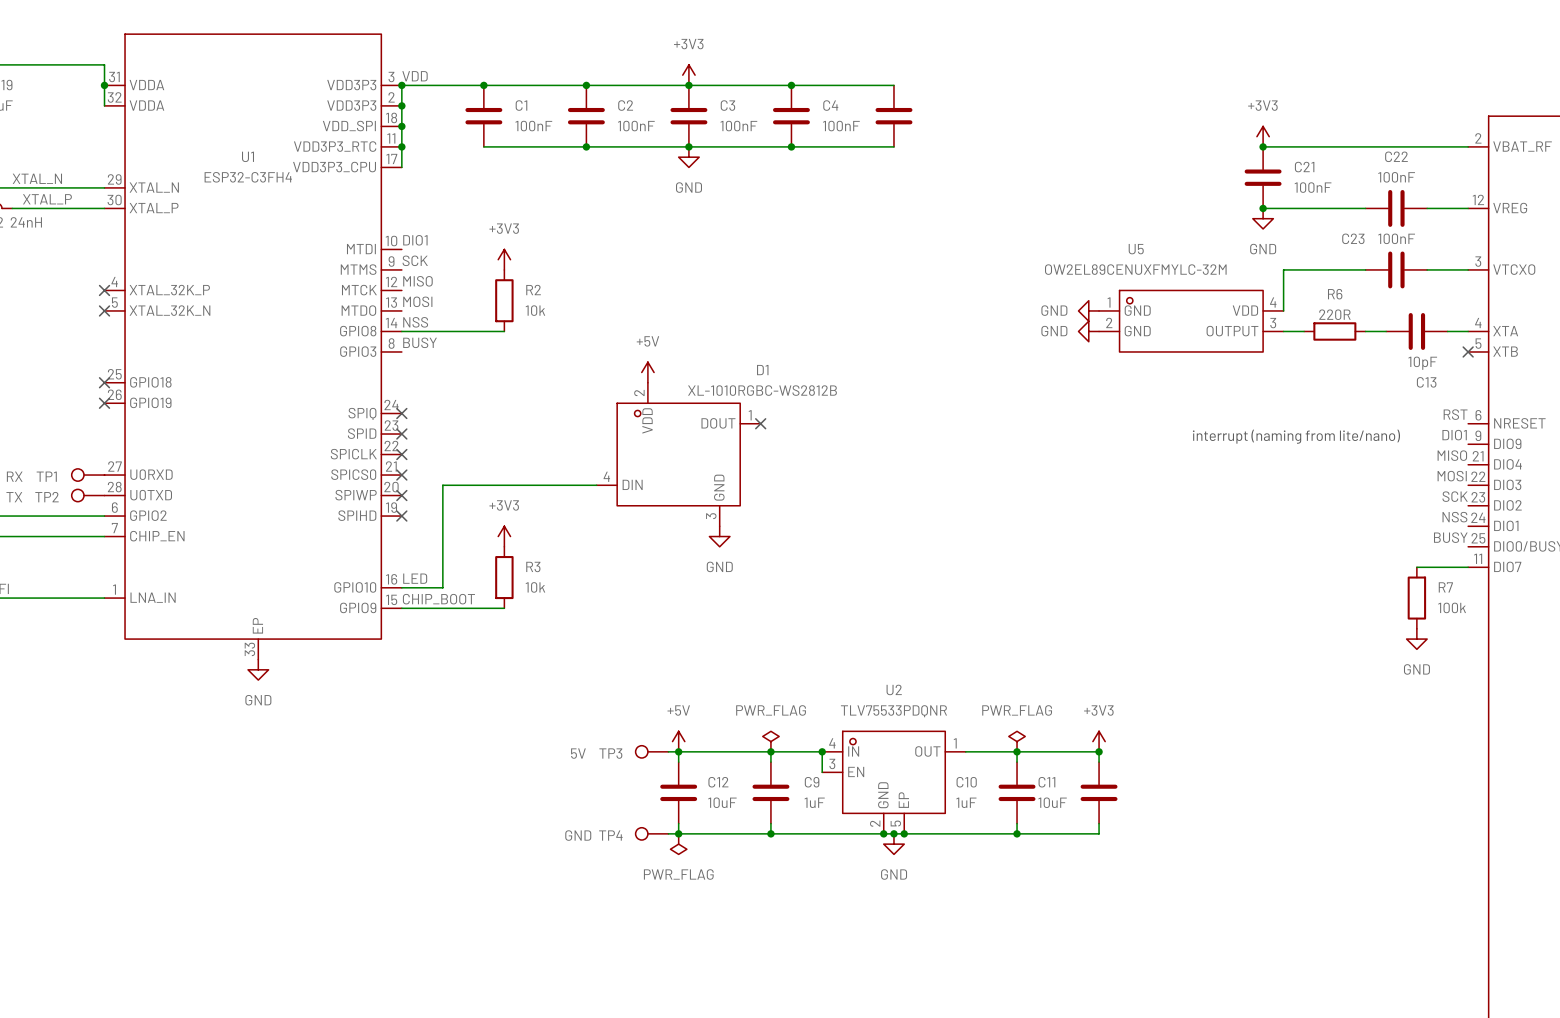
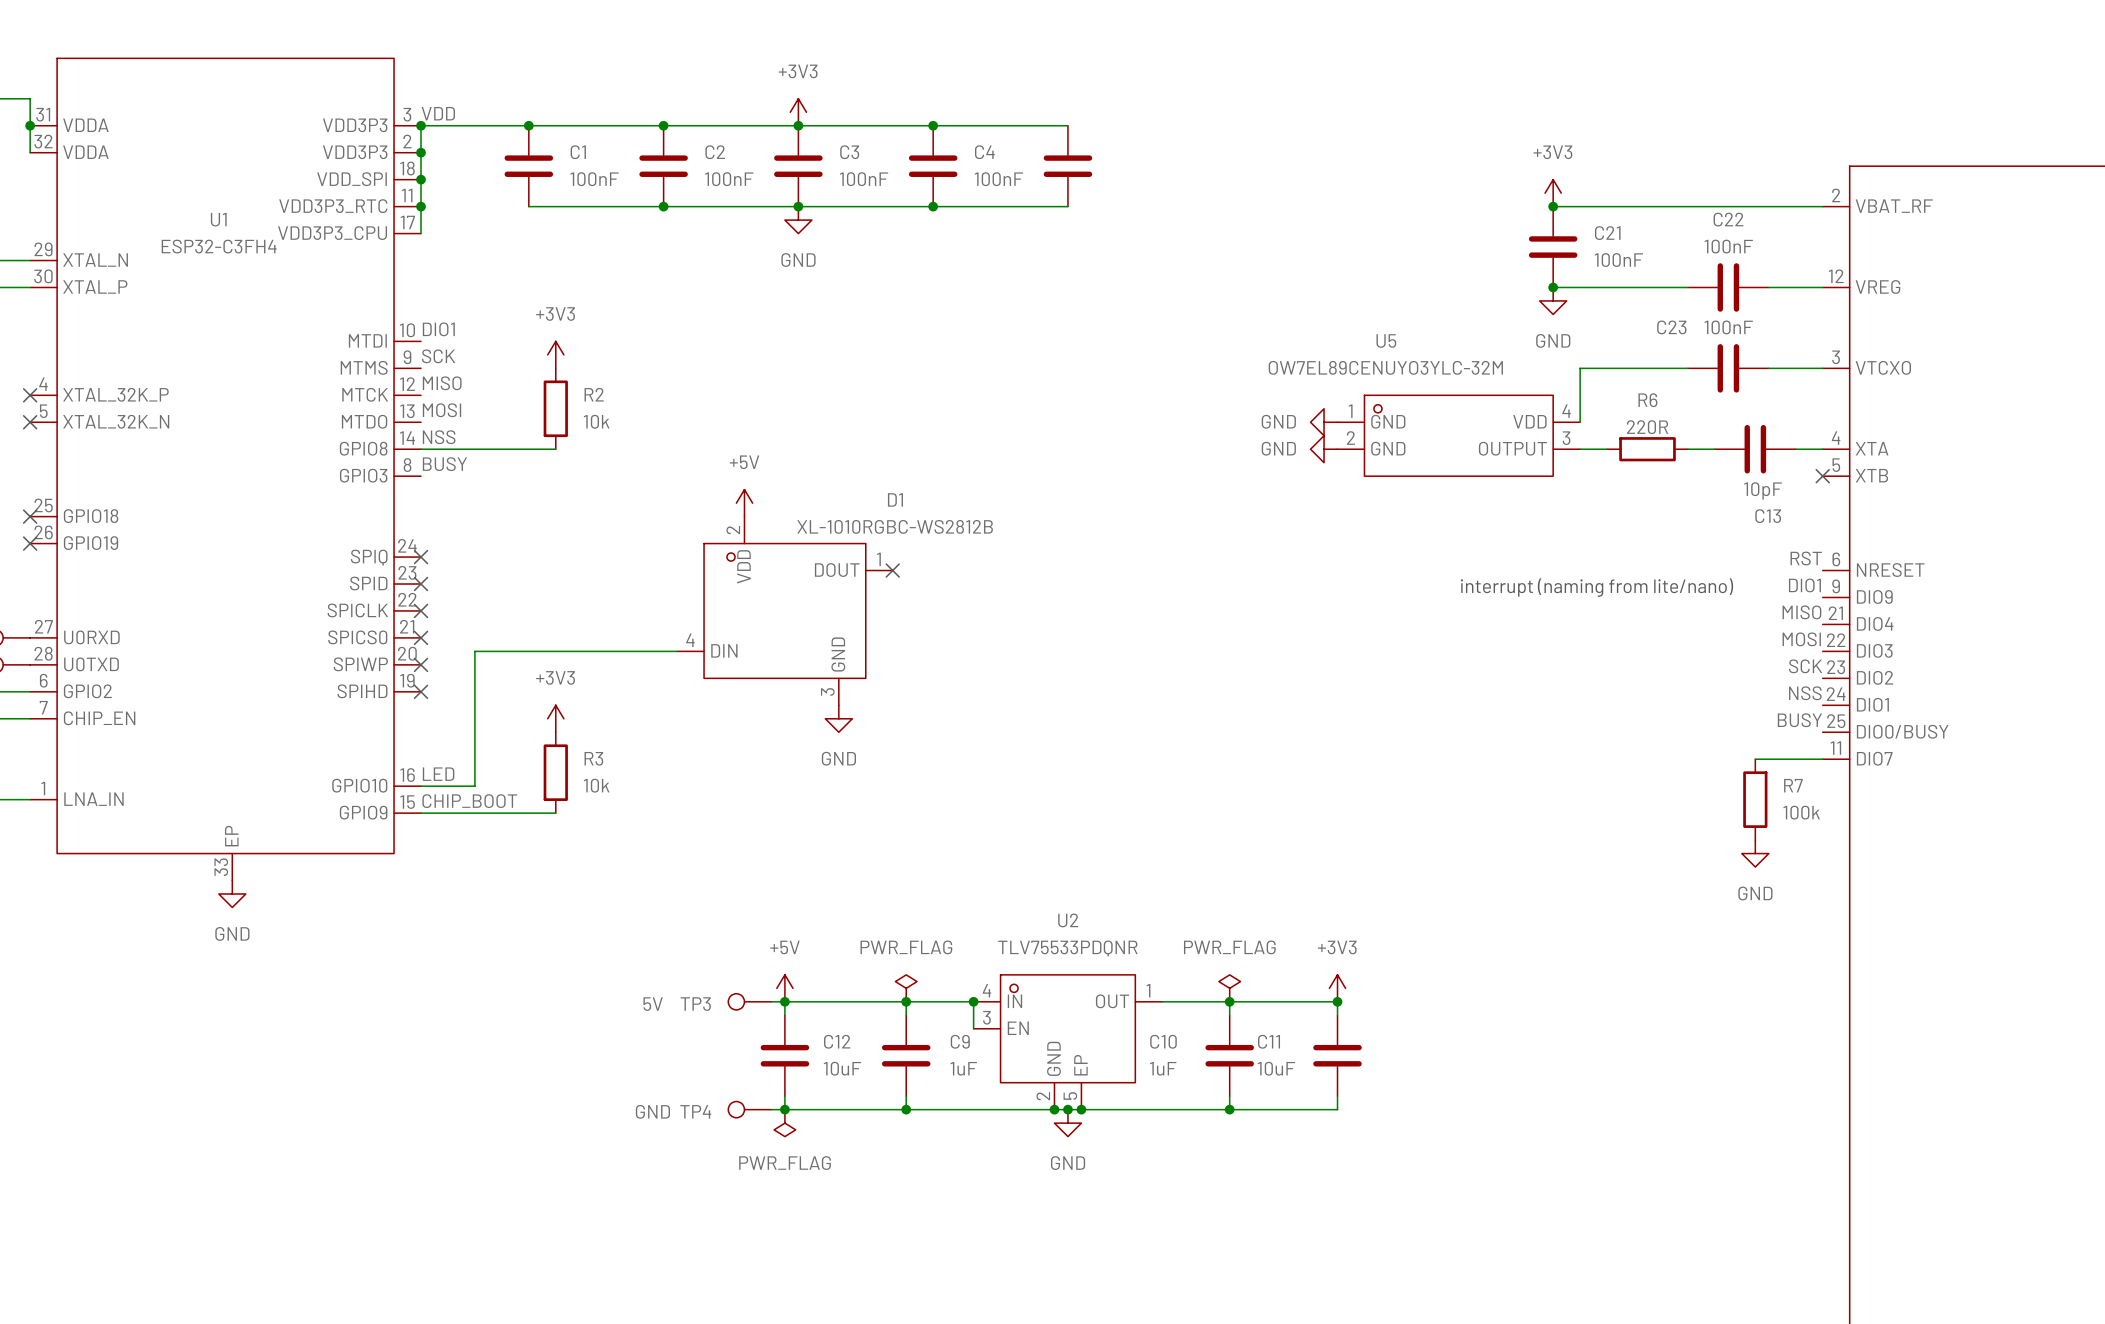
U5 value: OW2EL89CENUXFMYLC-32M (1135, 269) -> OW7EL89CENUYO3YLC-32M (1385, 367)

